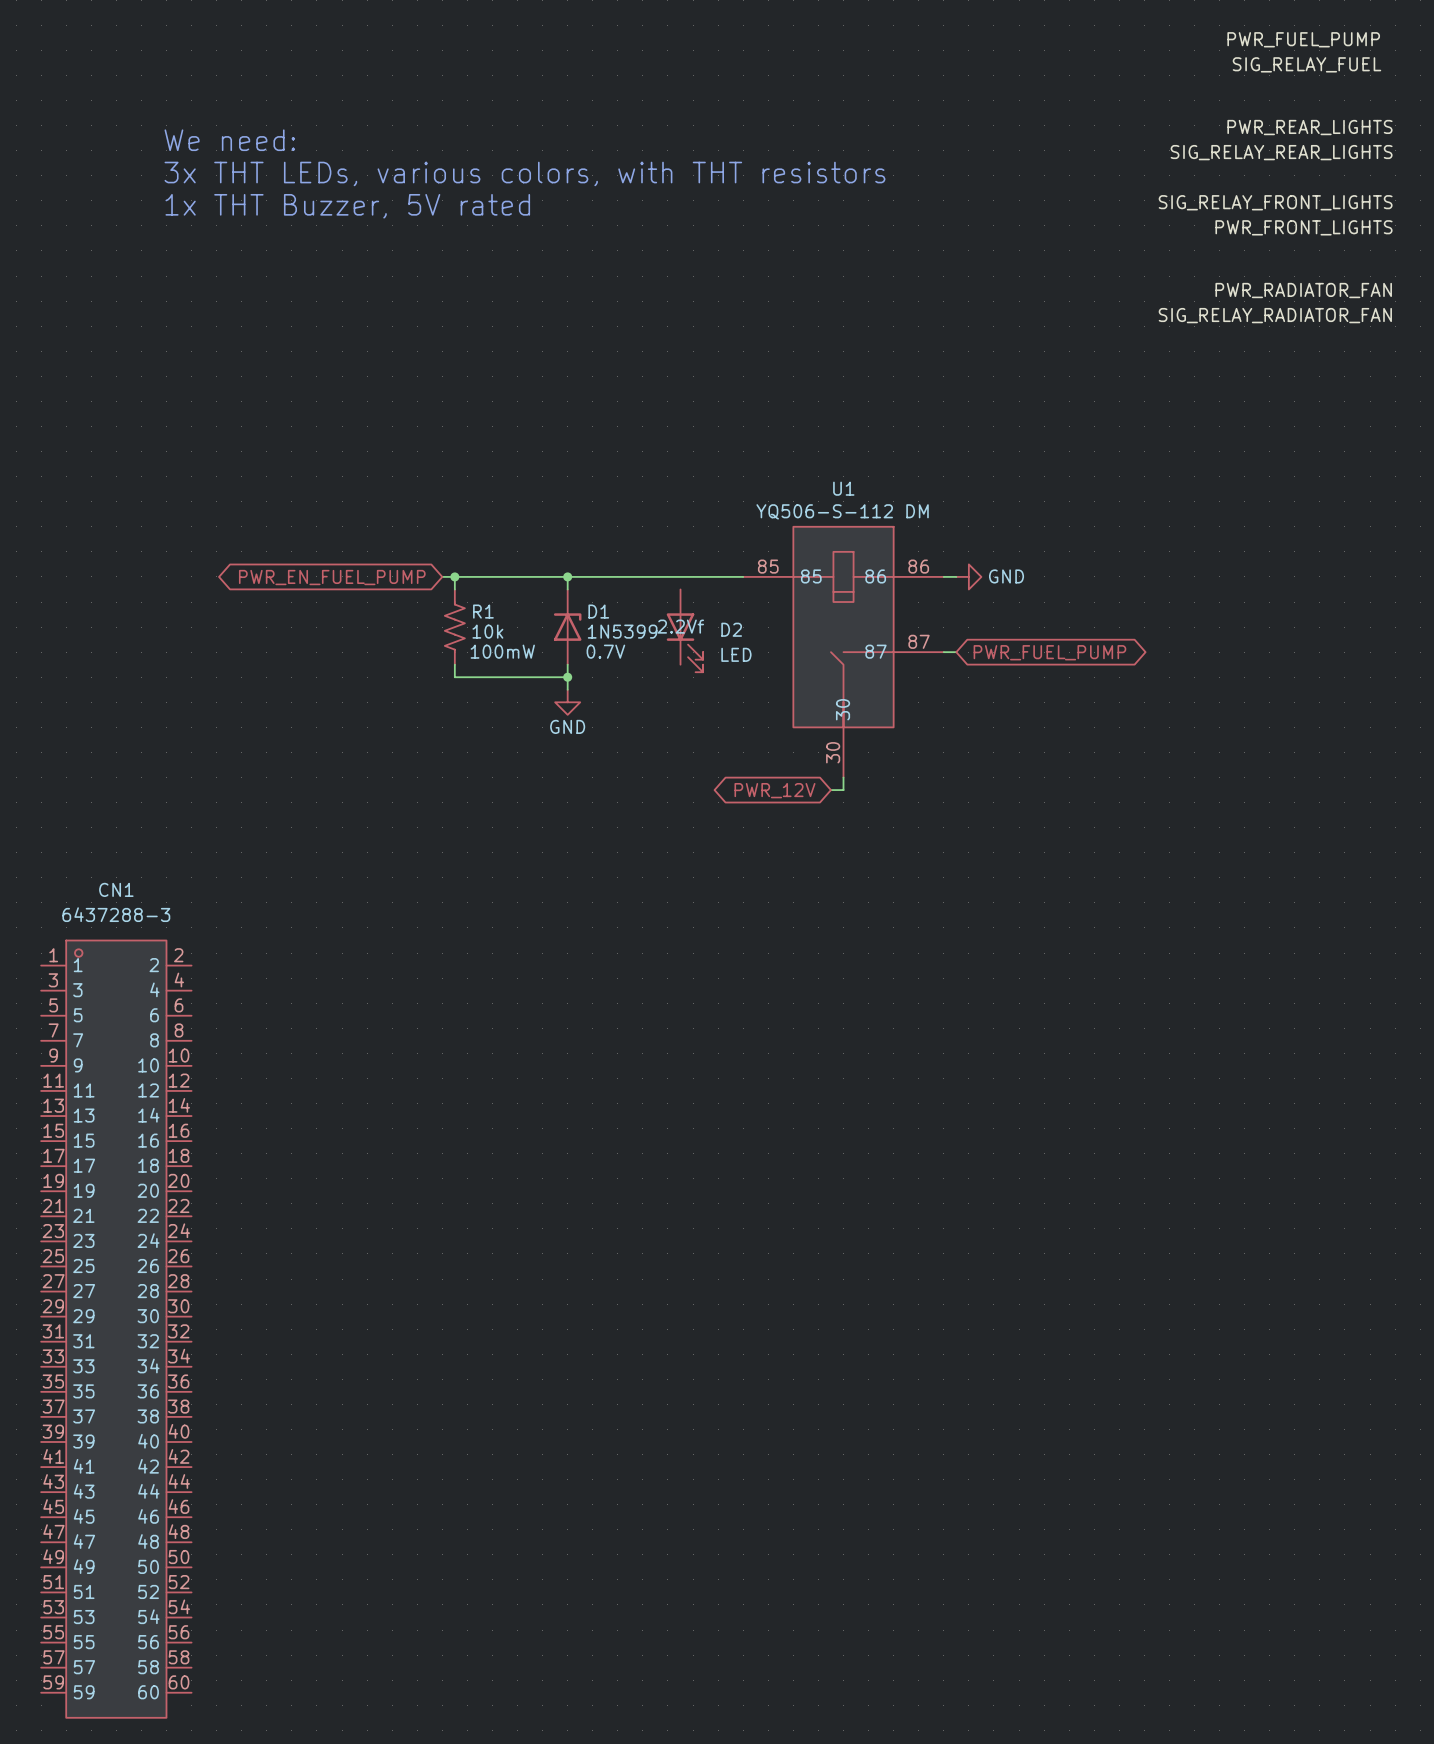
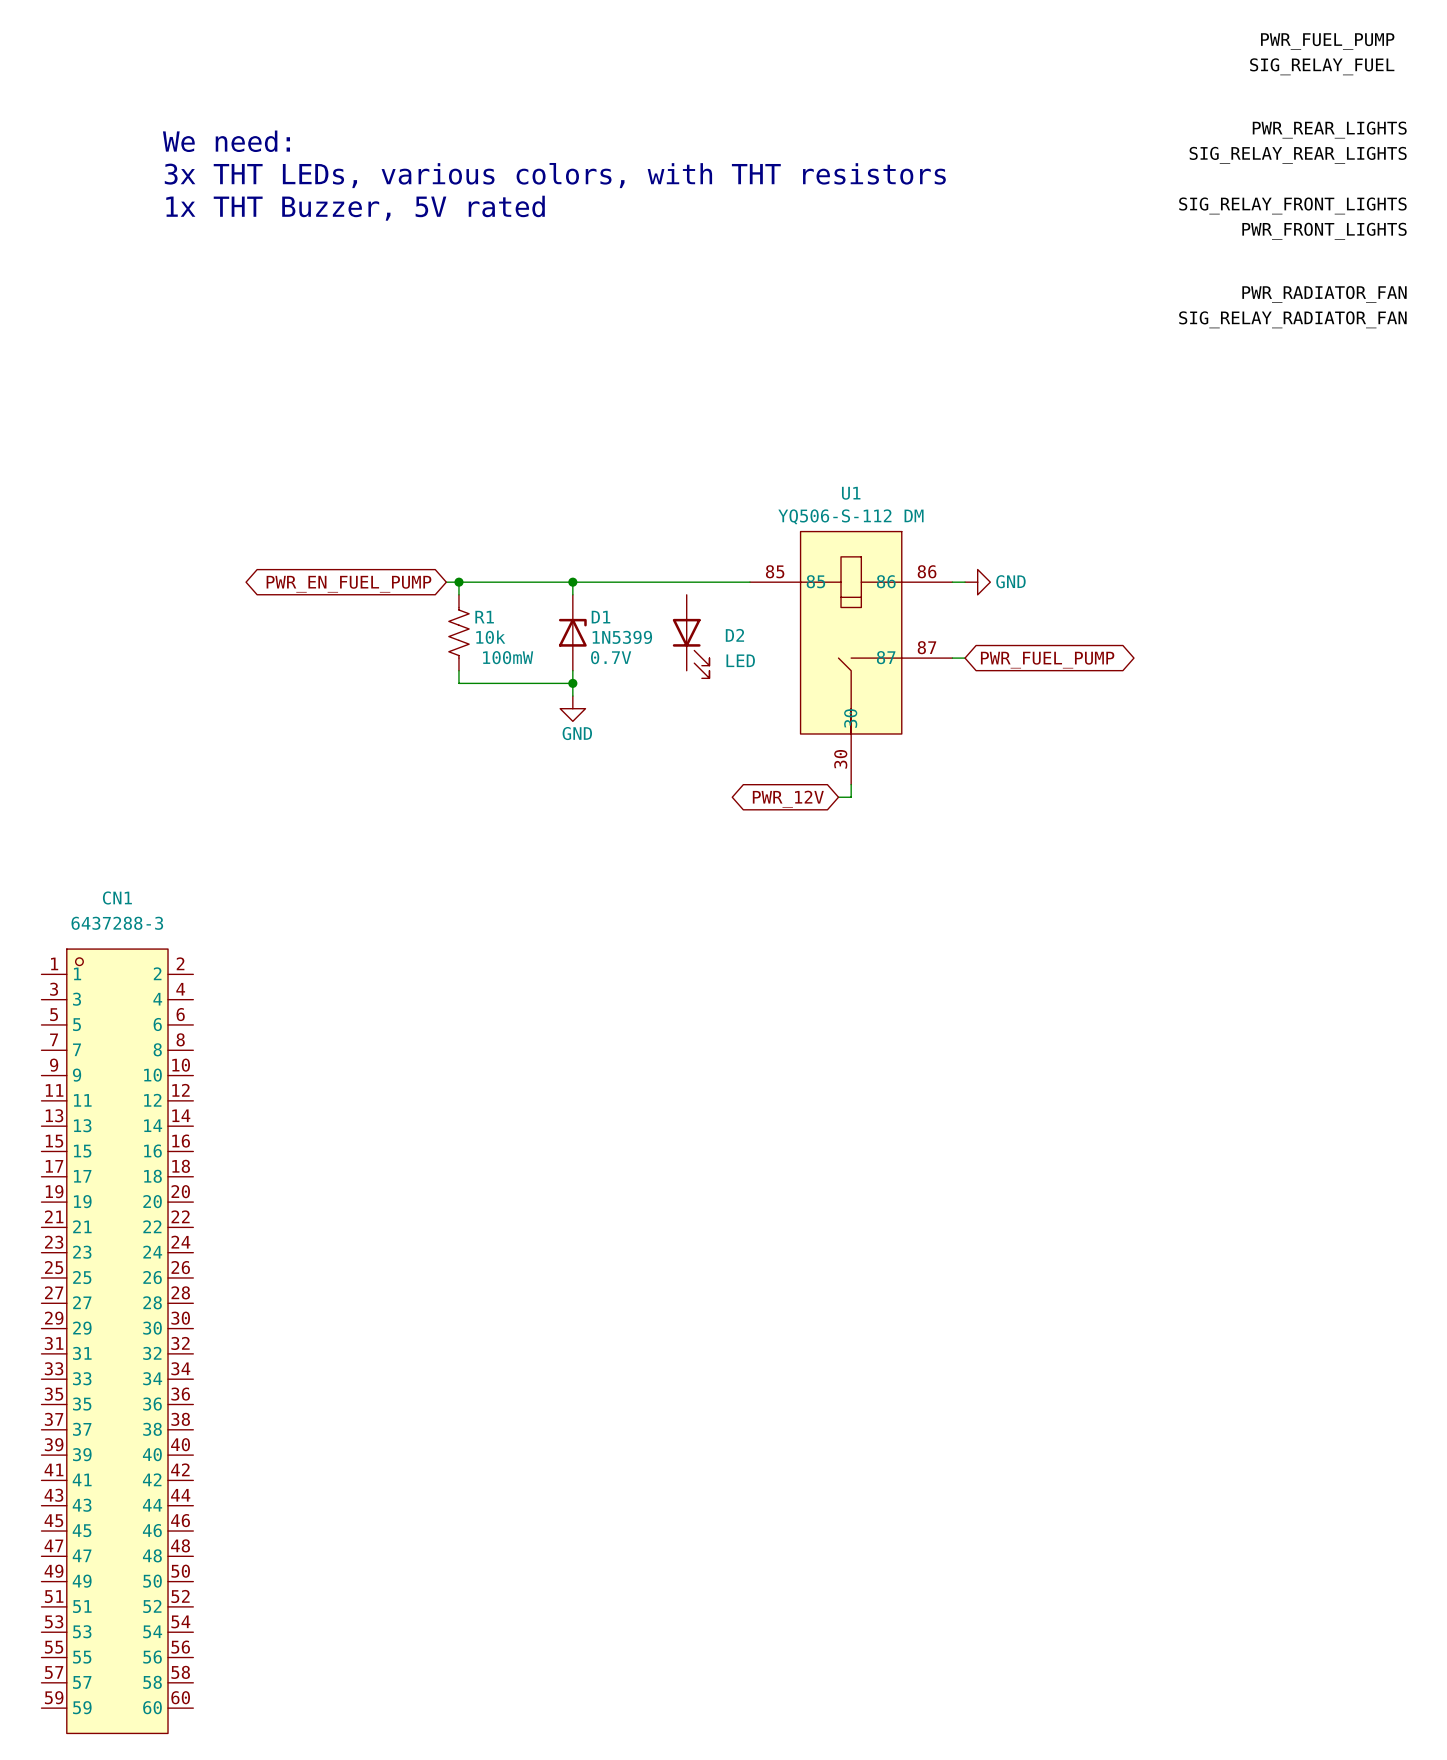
D2 text: 2.2Vf (680, 626) -> none

